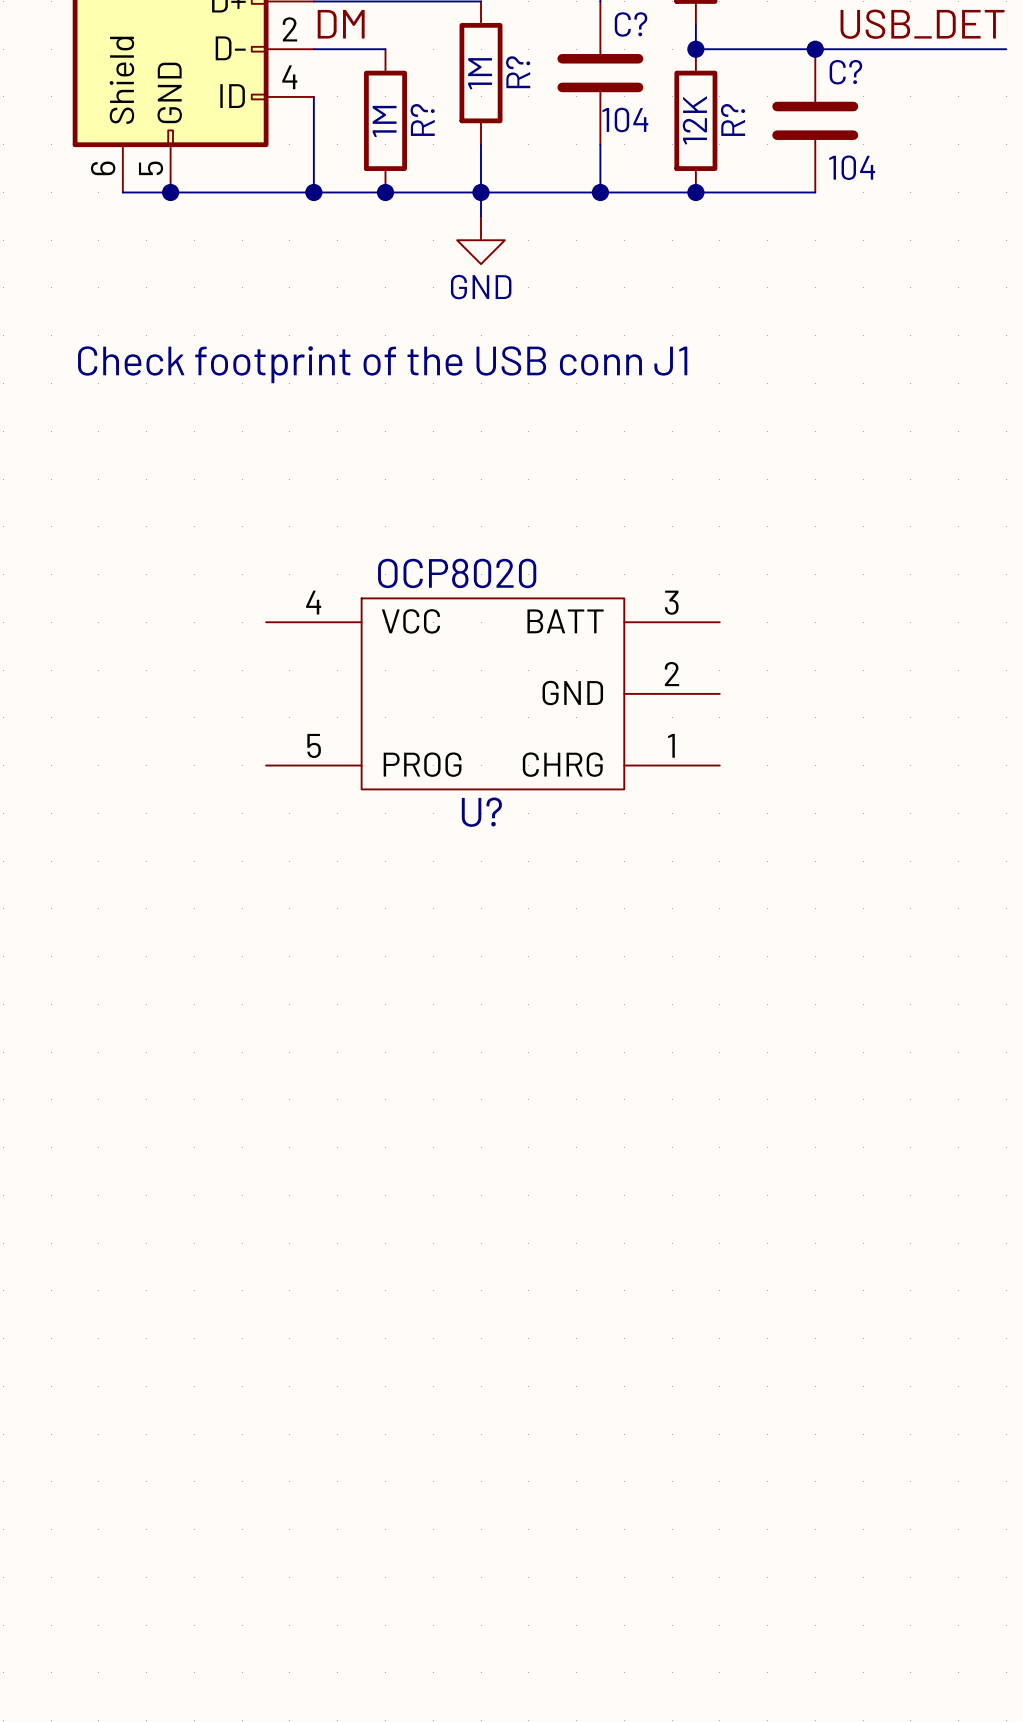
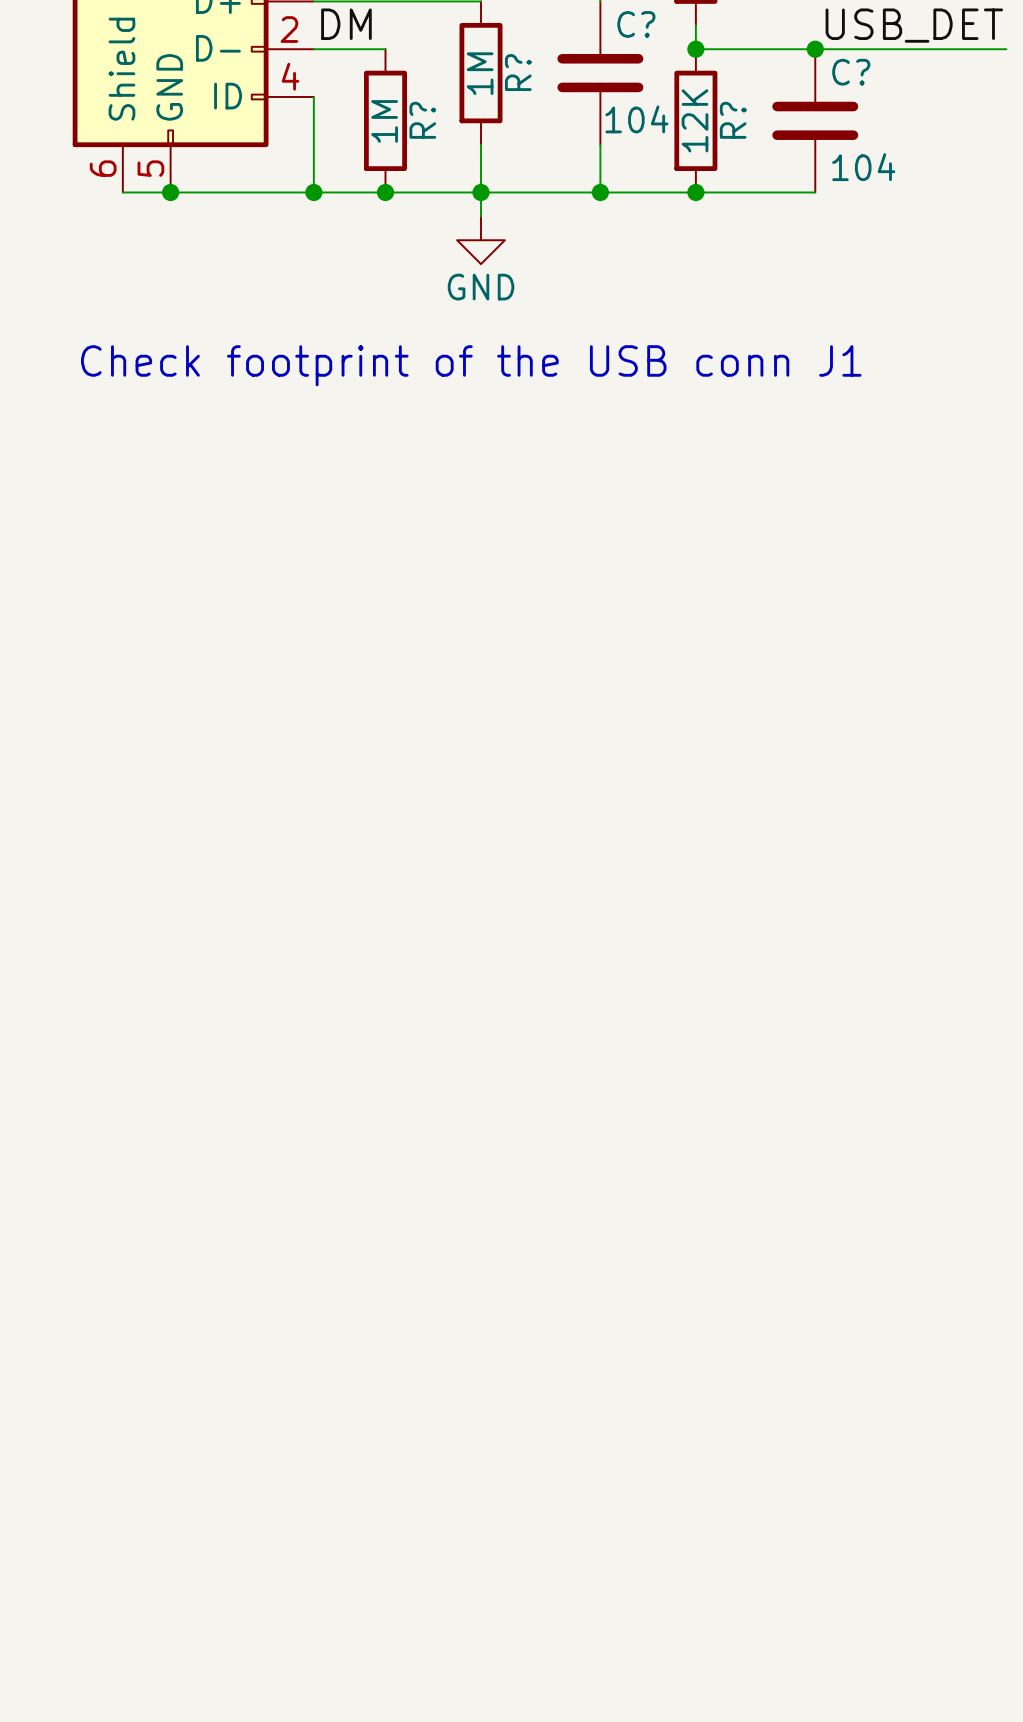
U?: OCP8020 (492, 693) -> none

